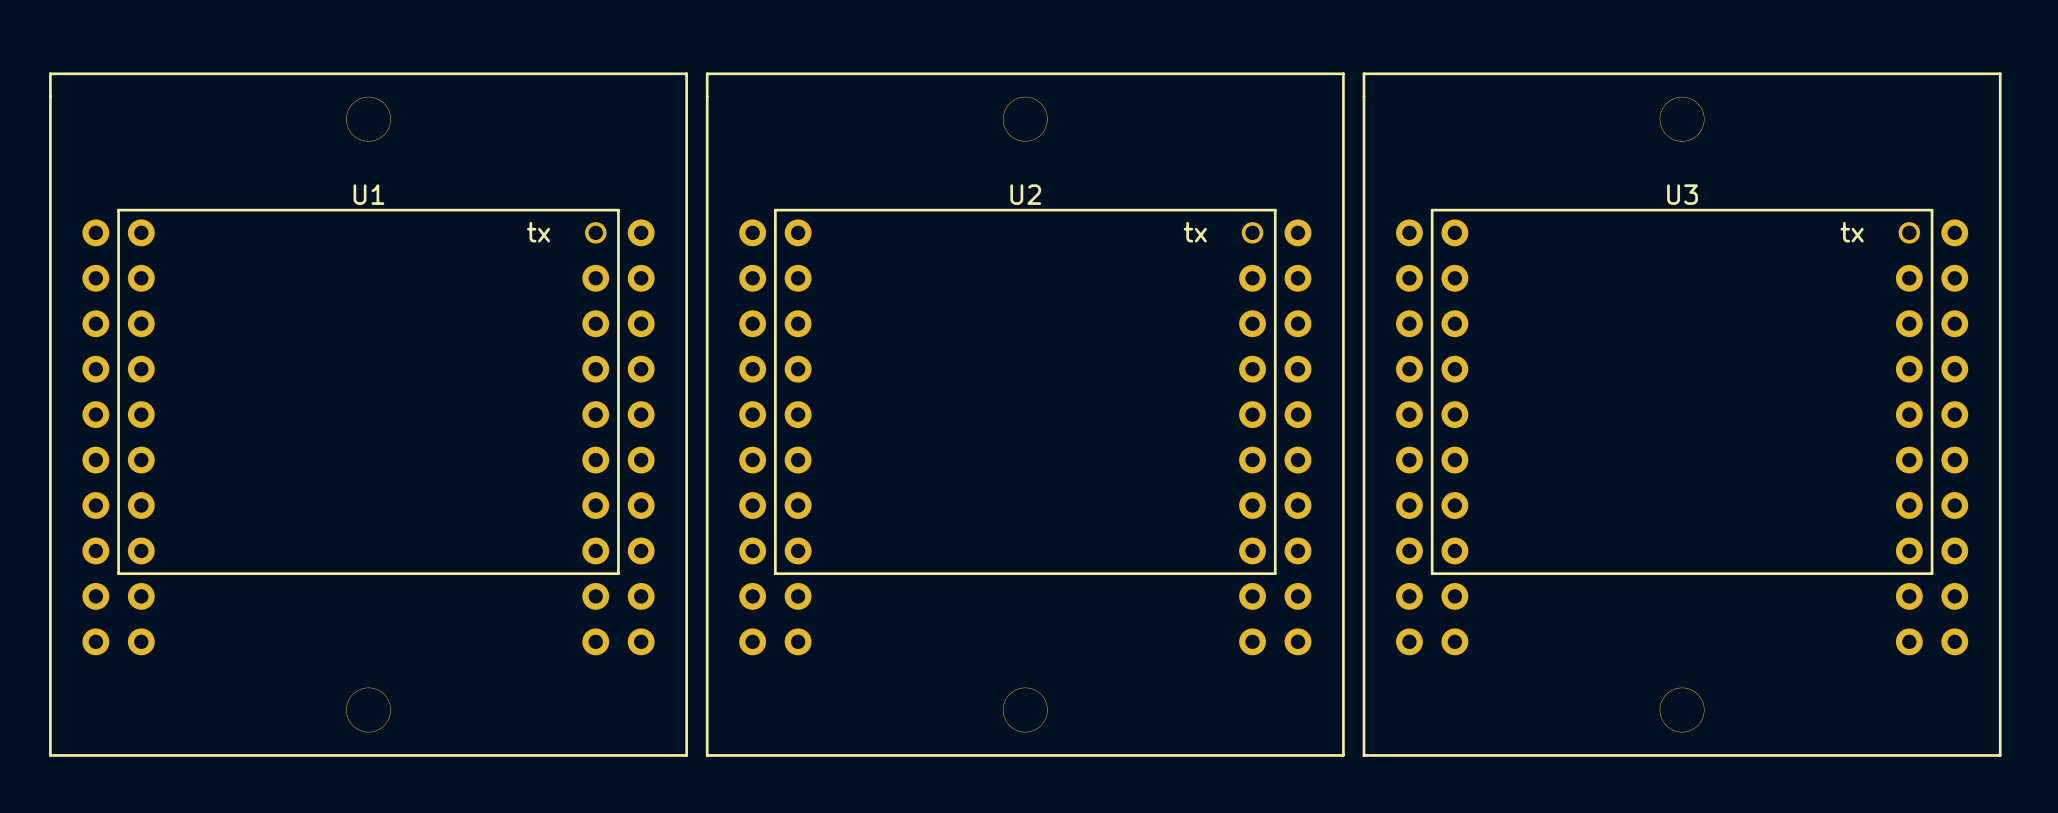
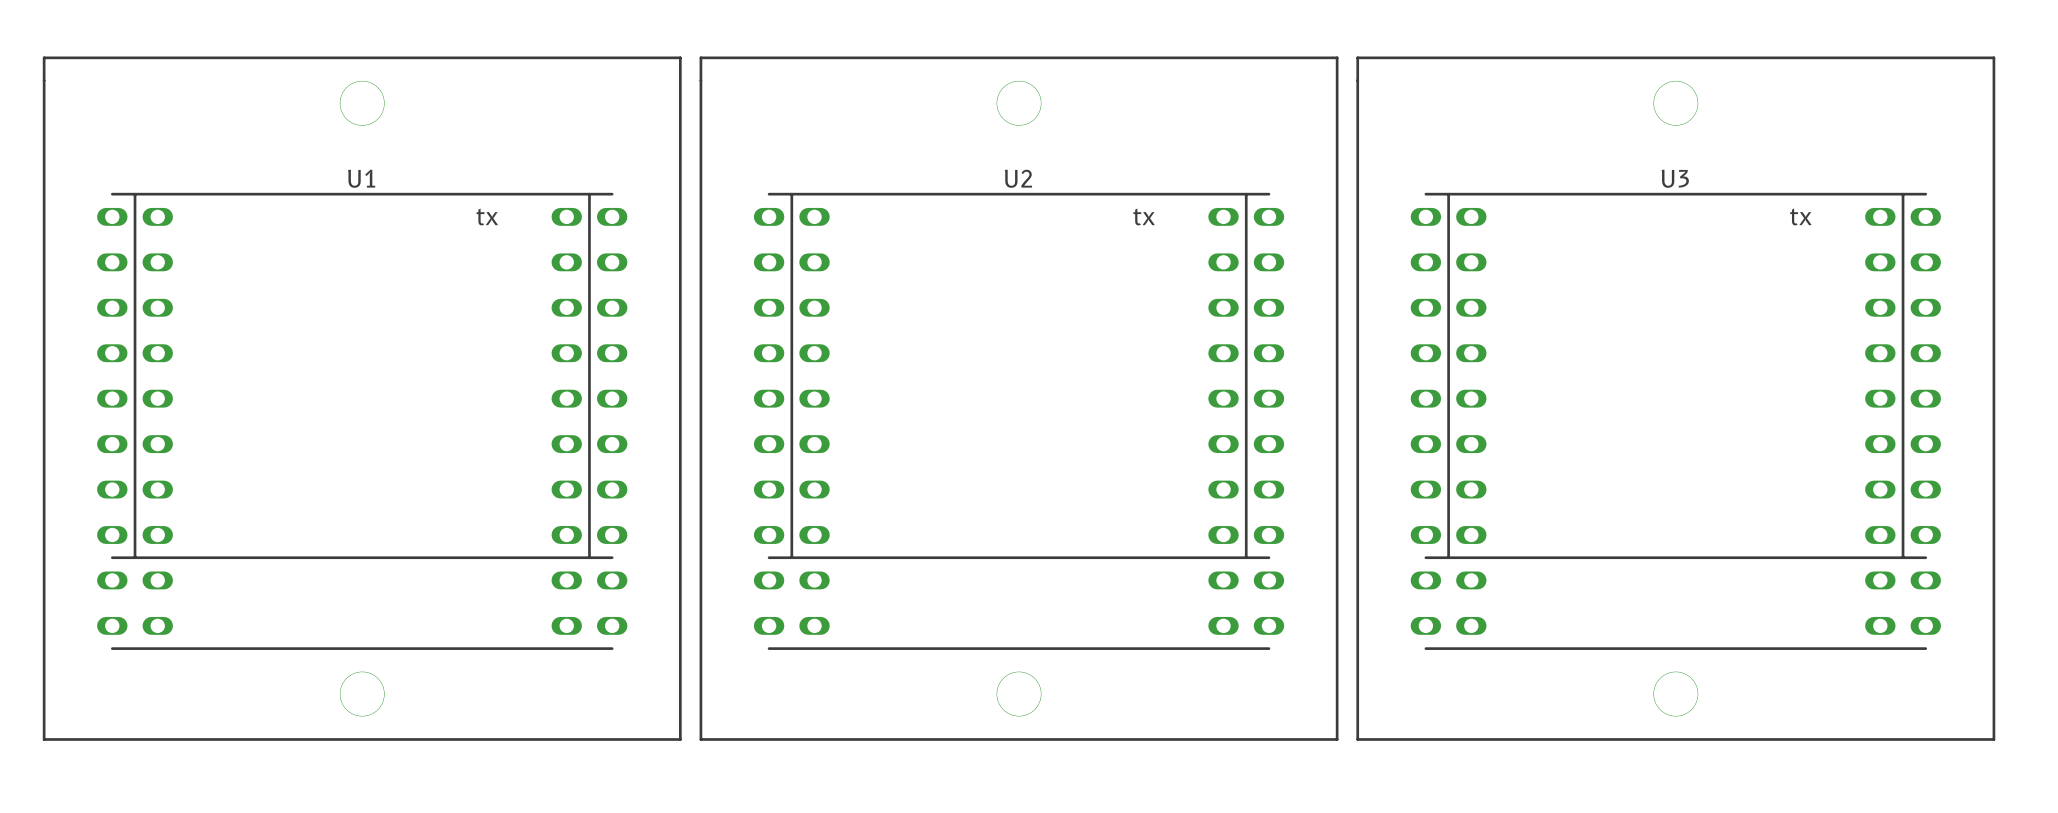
U1 footprint: [49, 72, 688, 757] -> [42, 56, 682, 741]
U2 footprint: [705, 72, 1345, 757] -> [699, 56, 1339, 741]
U3 footprint: [1362, 72, 2002, 757] -> [1356, 56, 1996, 741]

